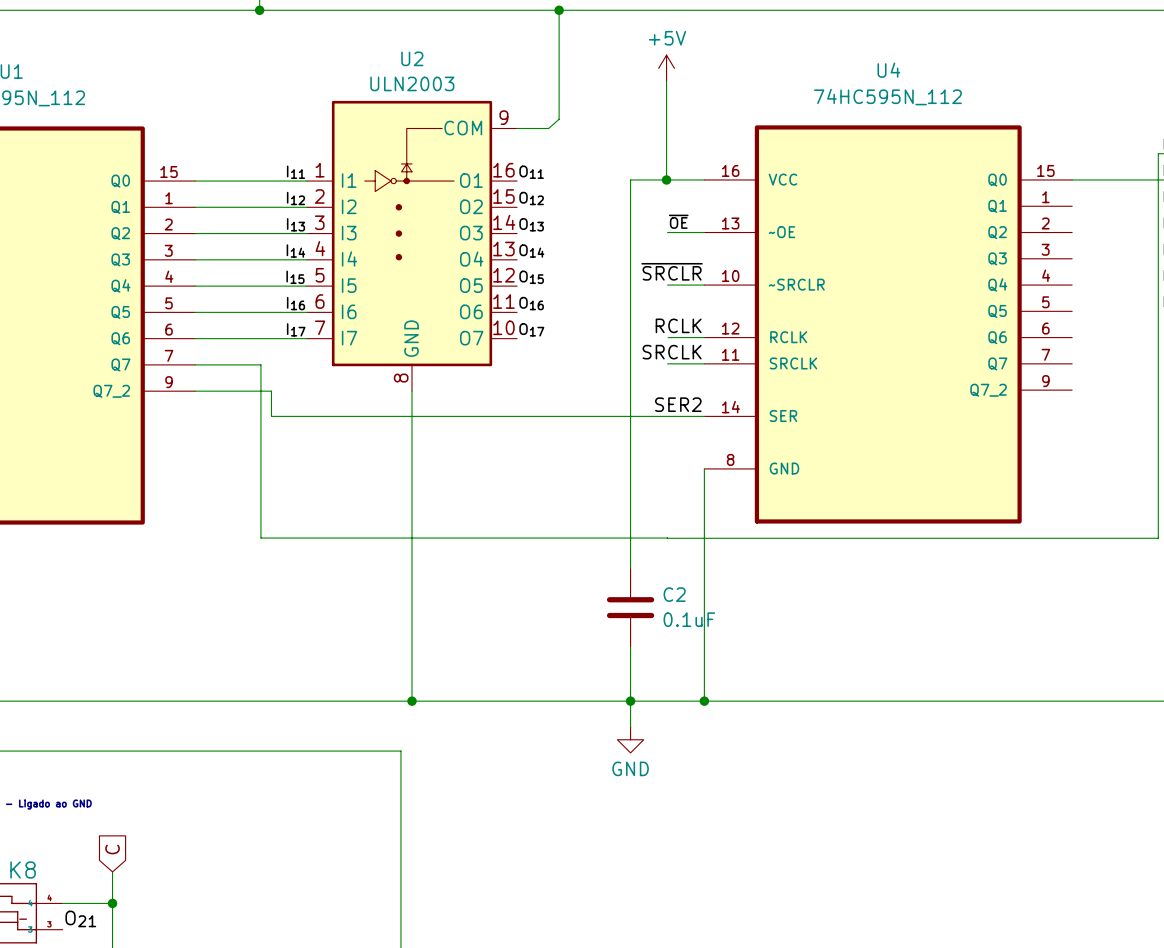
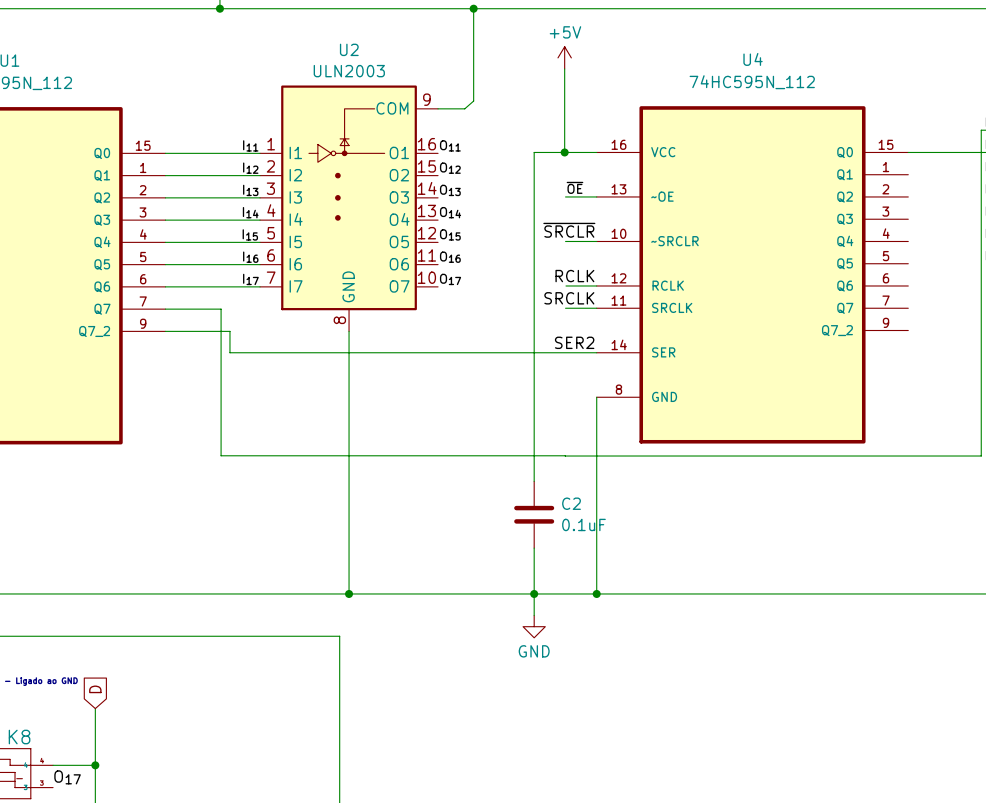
global label: none -> D (95, 689)
wire: none -> (95, 708) (95, 738)
global label: C (112, 849) -> none
label: O21 (80, 918) -> O17 (67, 777)

